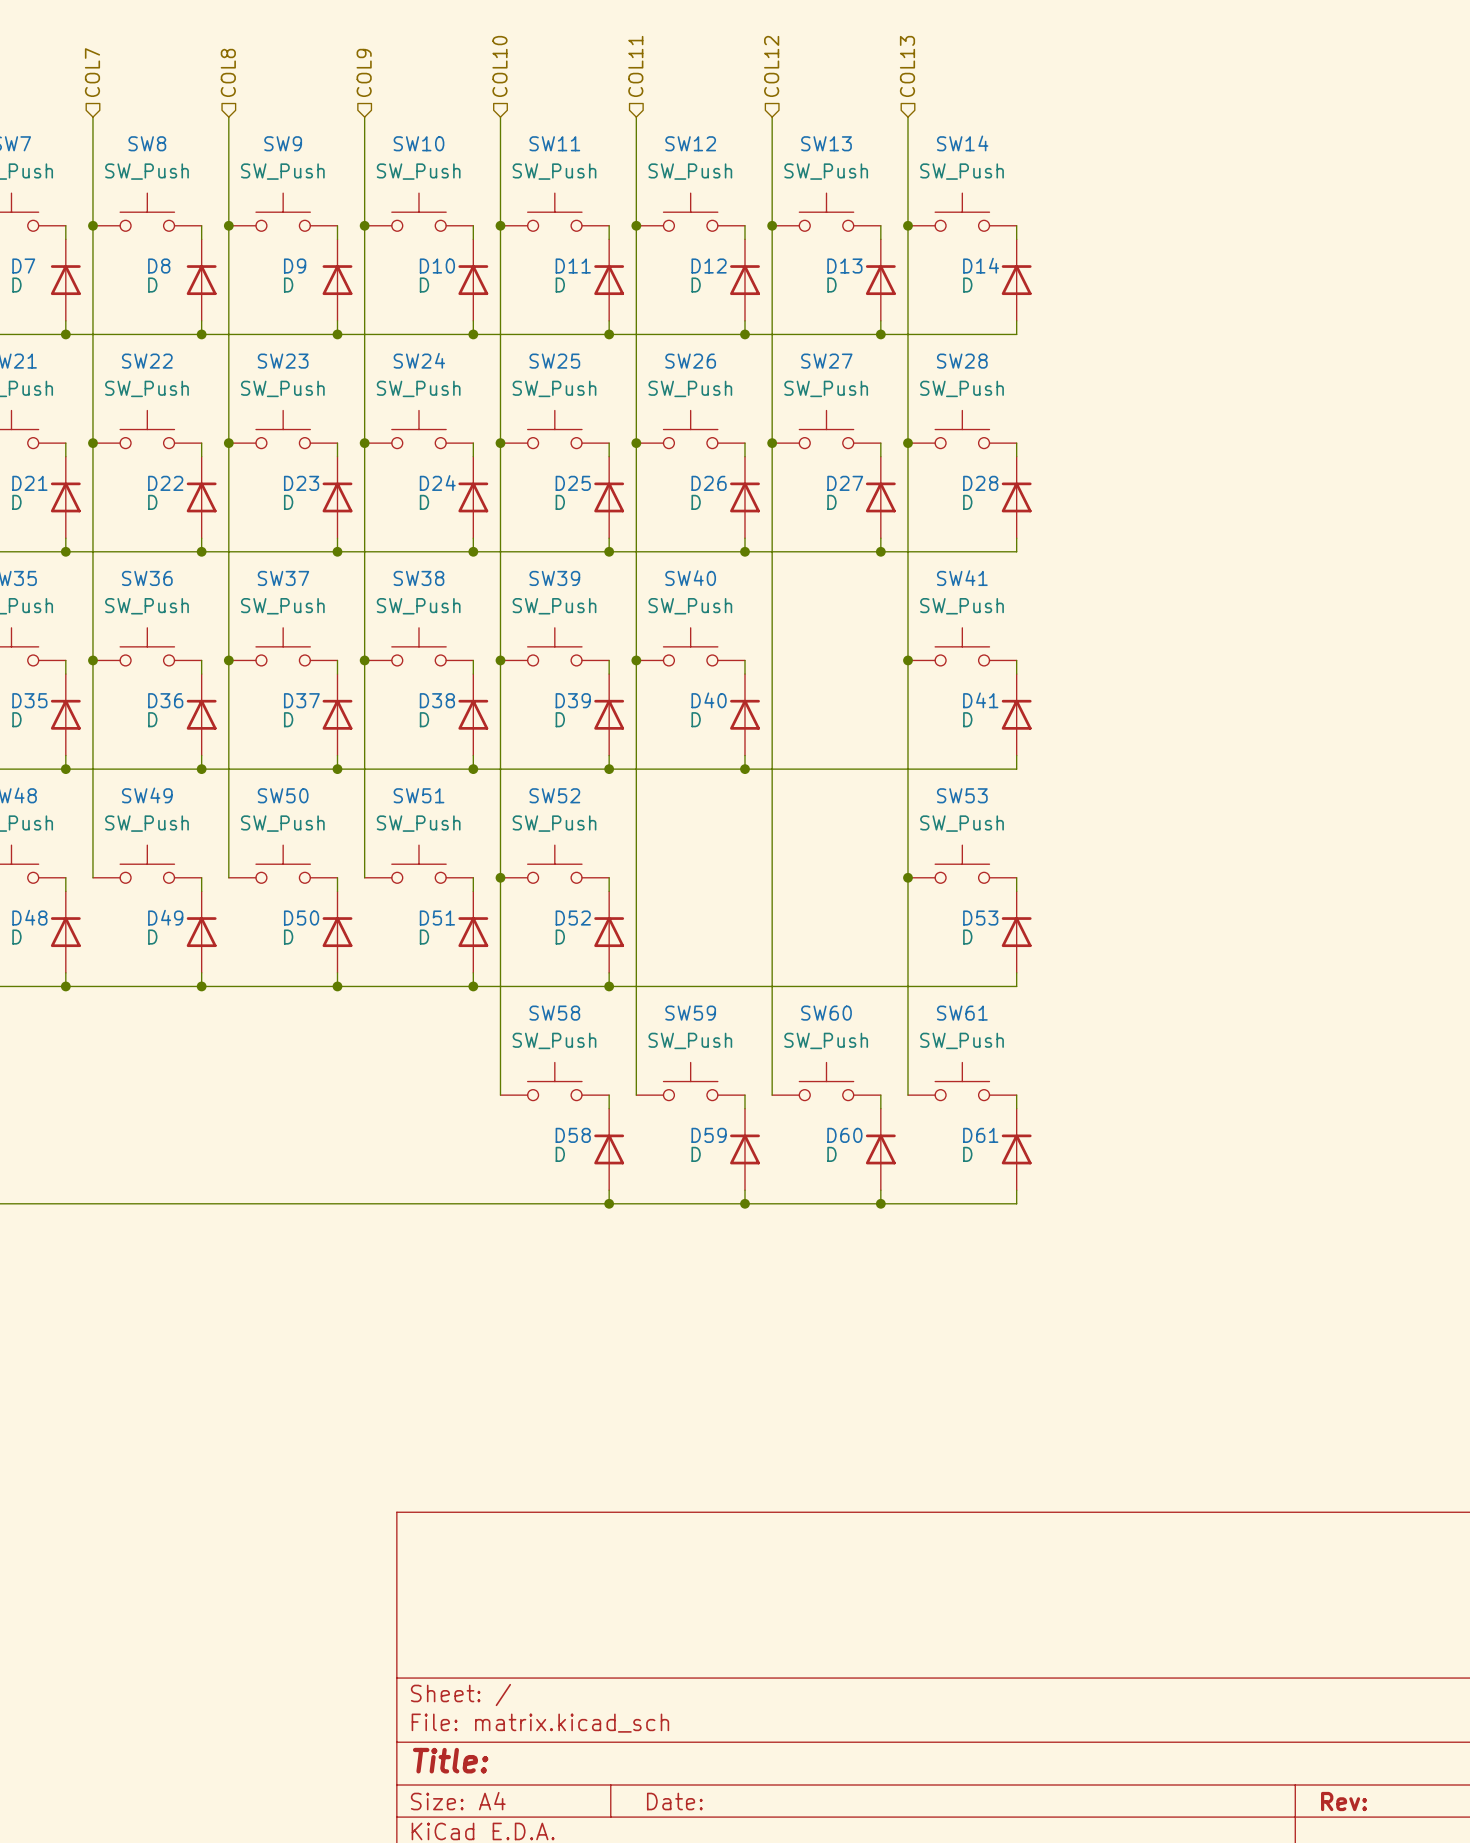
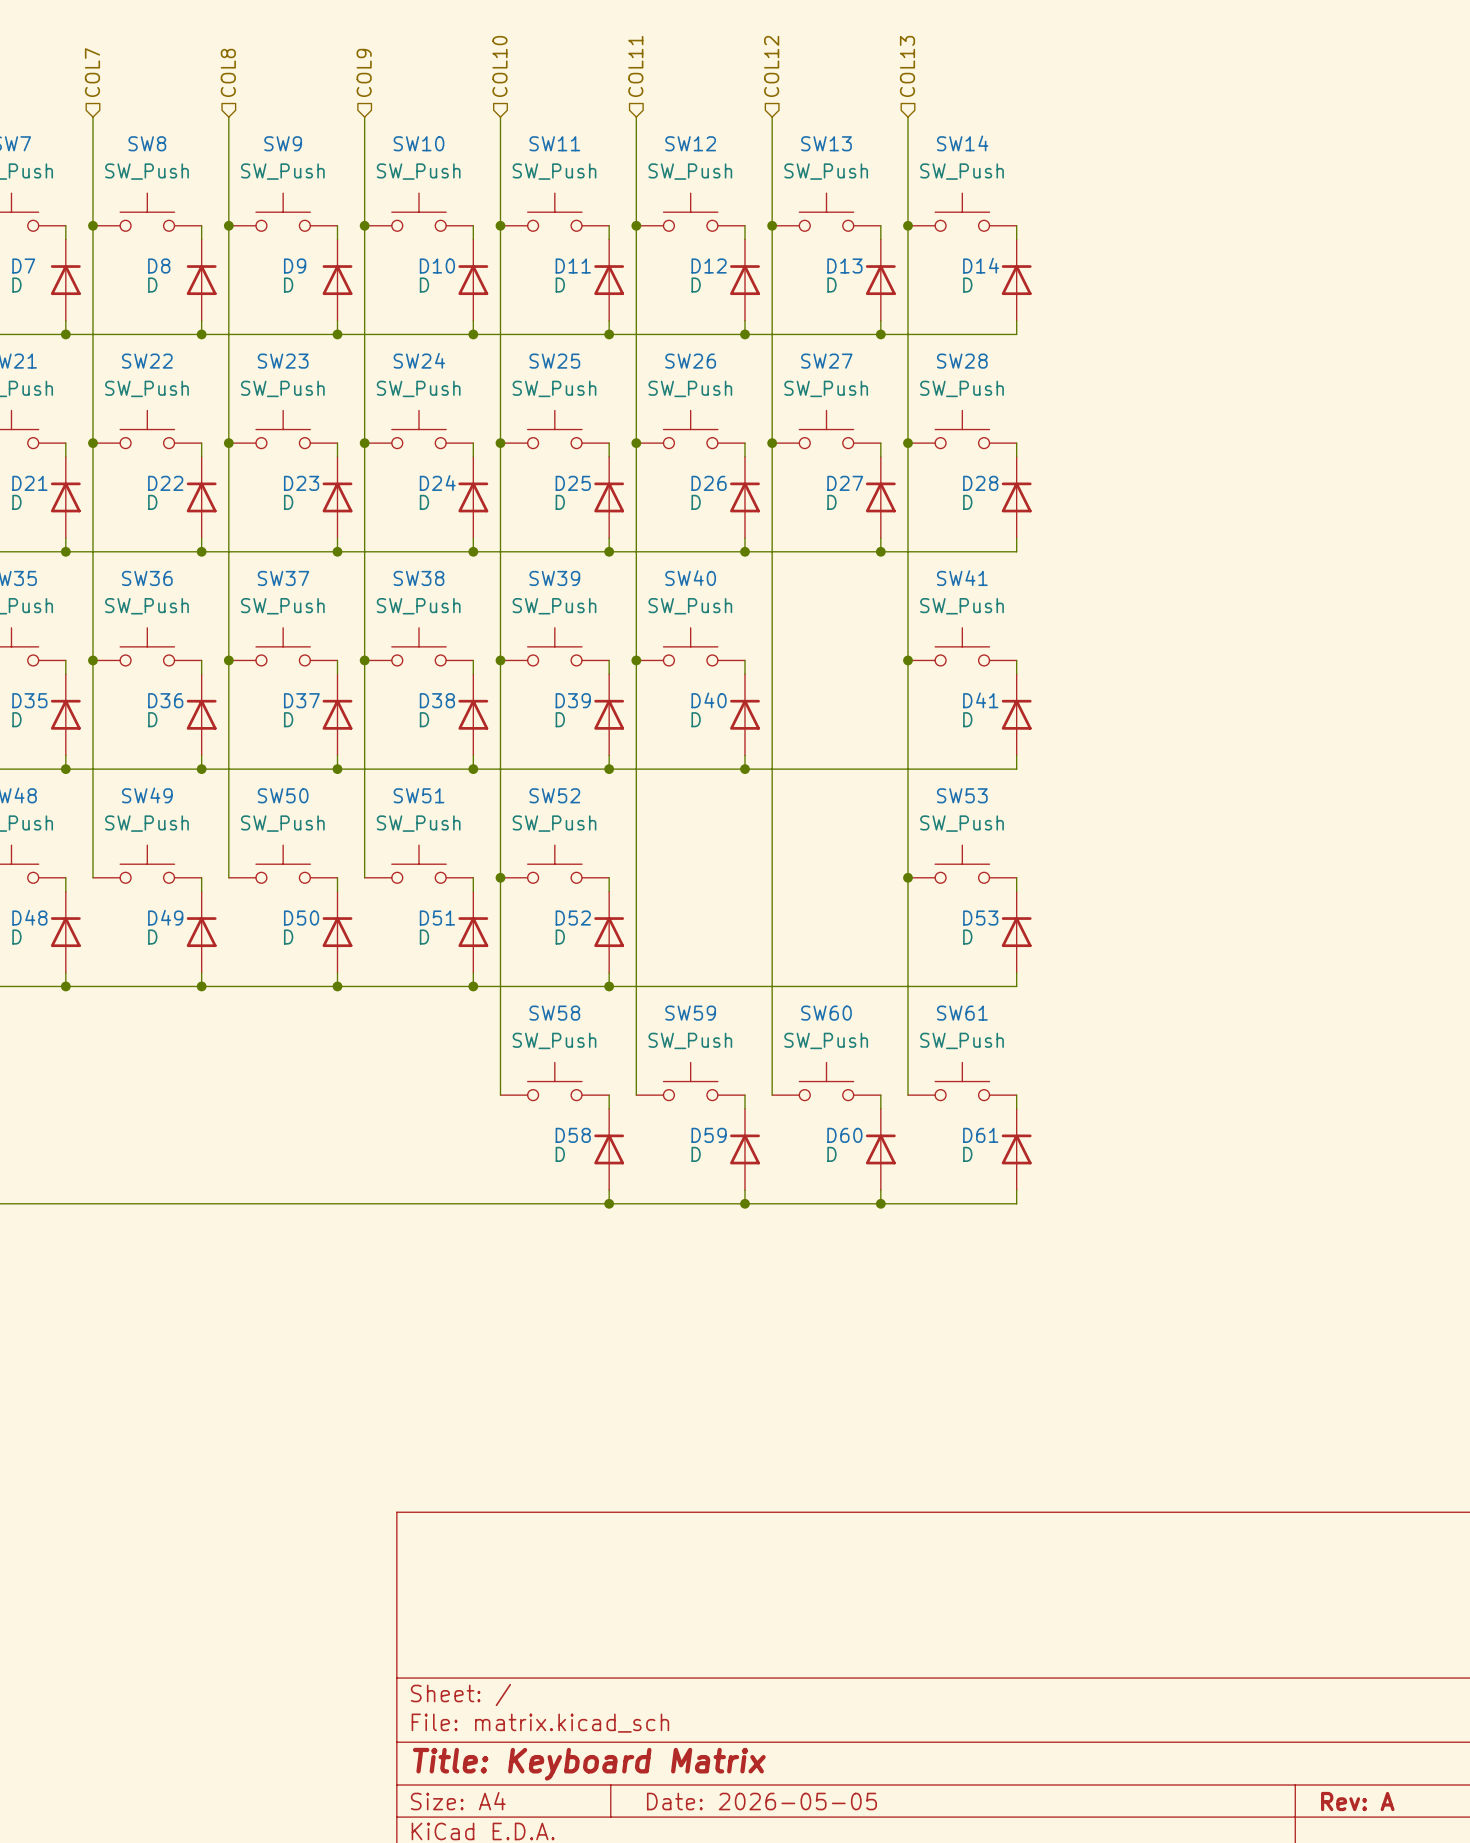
title block: Title: (450, 1760) -> Title: Keyboard Matrix (589, 1764)
title block: Date: (674, 1801) -> Date: 2026-05-05 (761, 1801)
title block: Rev: (1344, 1801) -> Rev: A (1357, 1801)

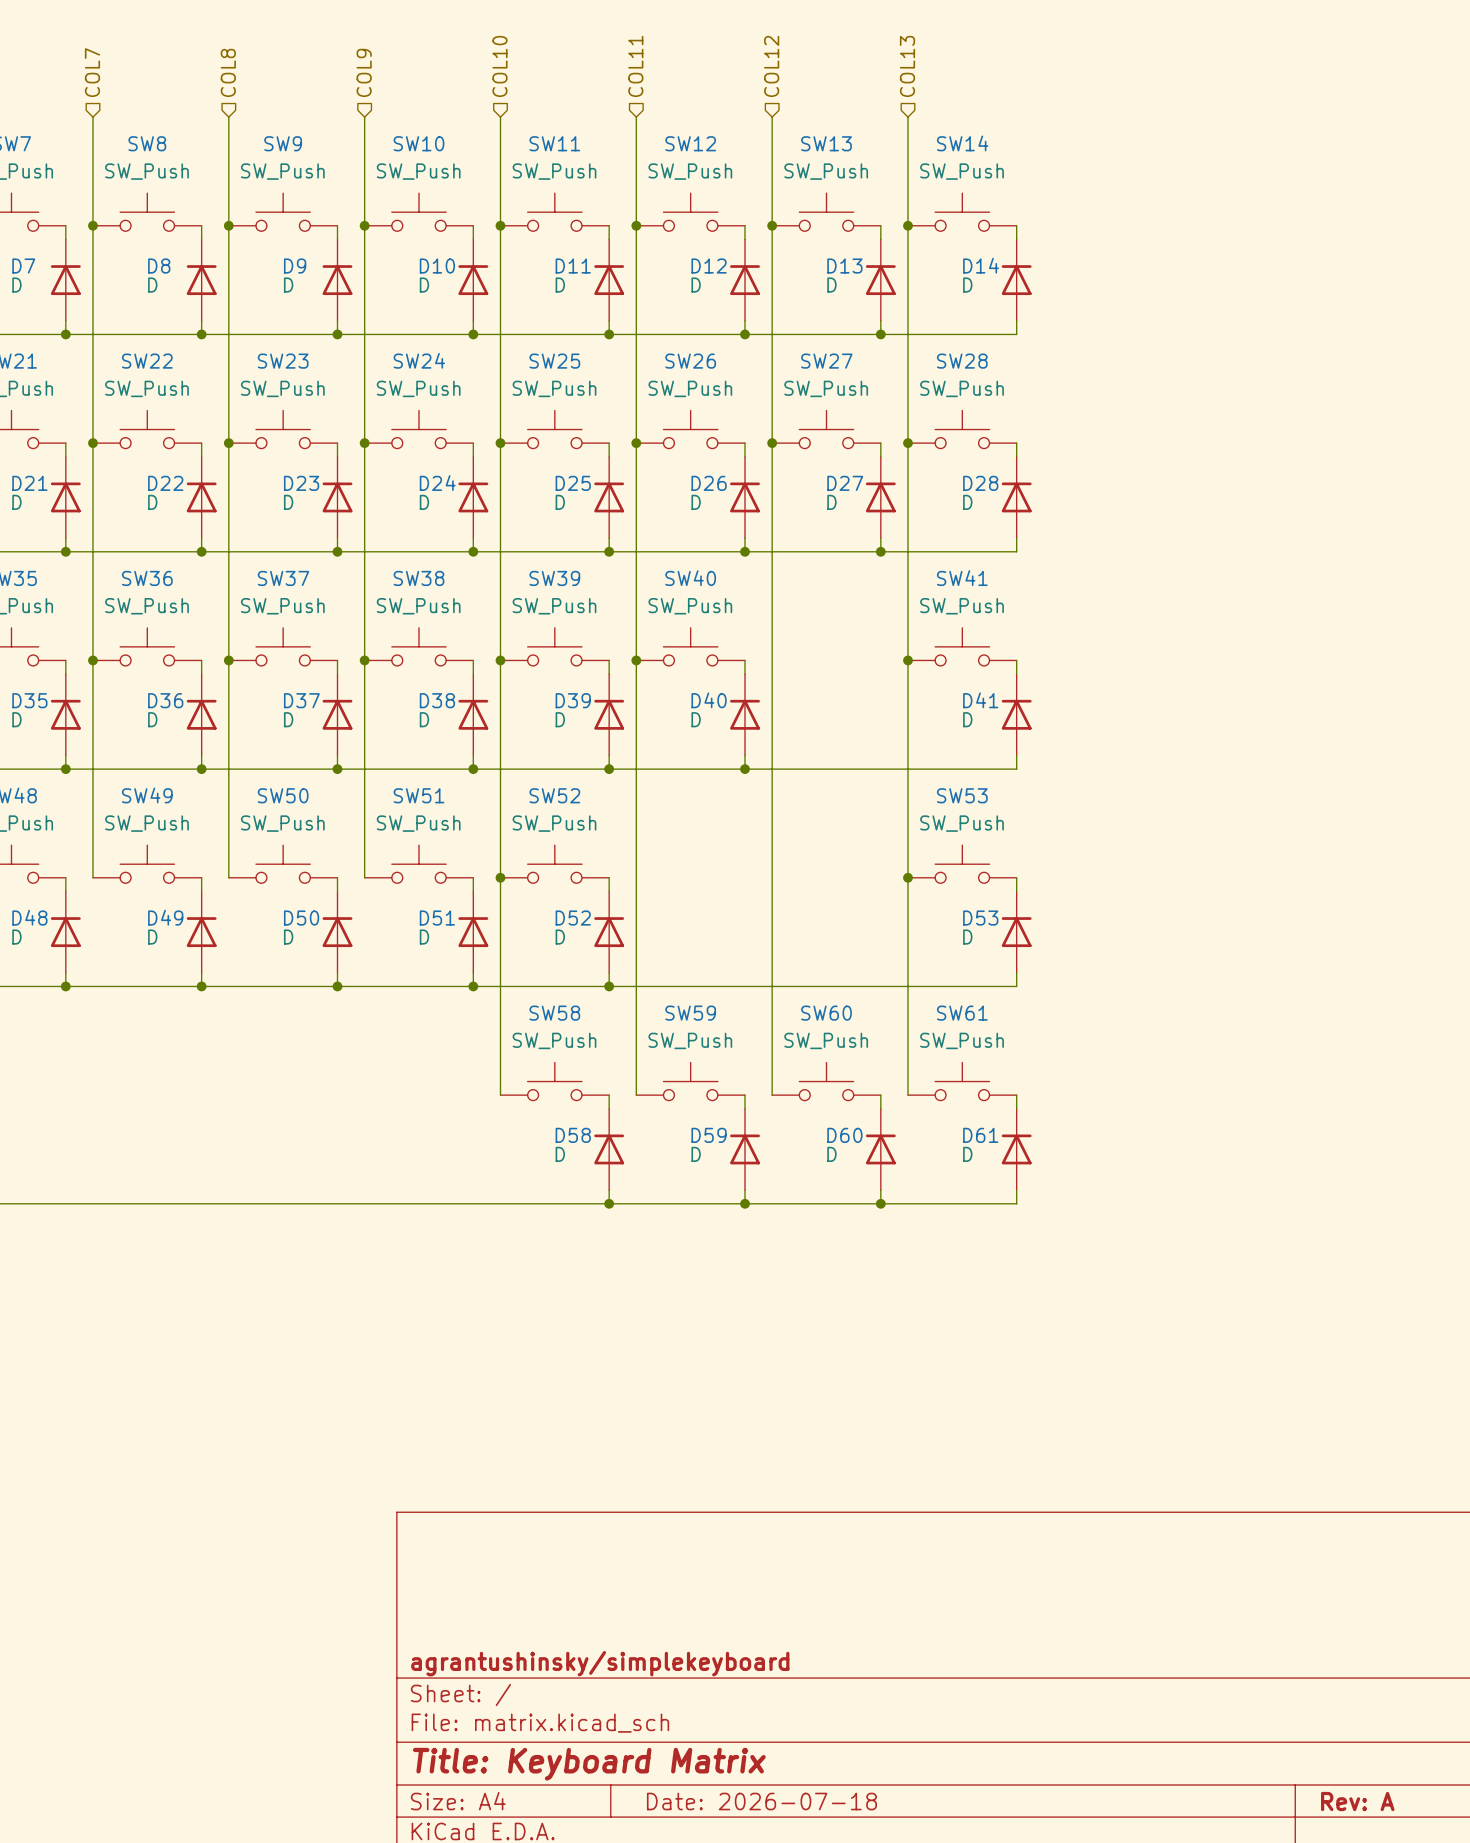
title block: none -> agrantushinsky/simplekeyboard (600, 1663)
title block: Date: 2026-05-05 (761, 1801) -> Date: 2026-07-18 (761, 1801)

